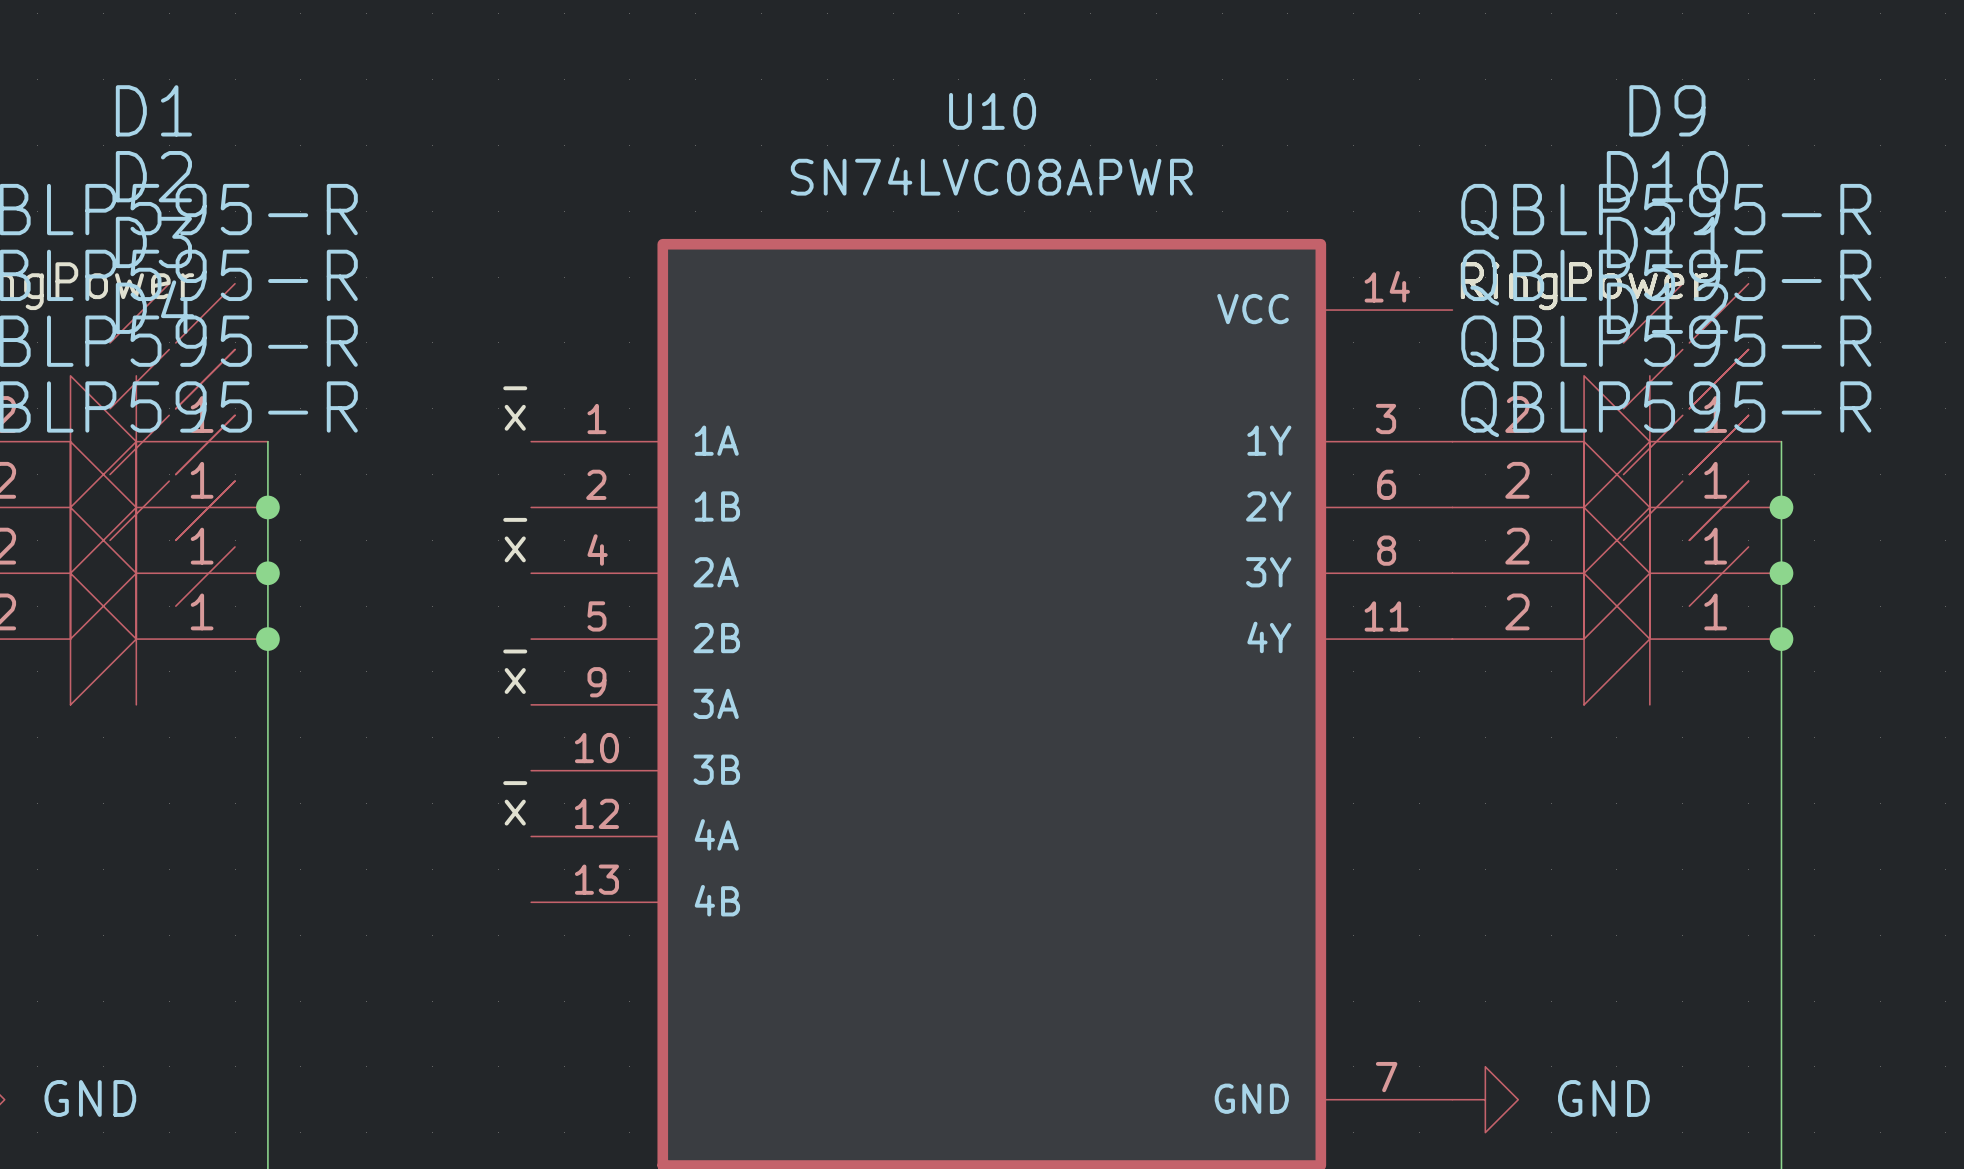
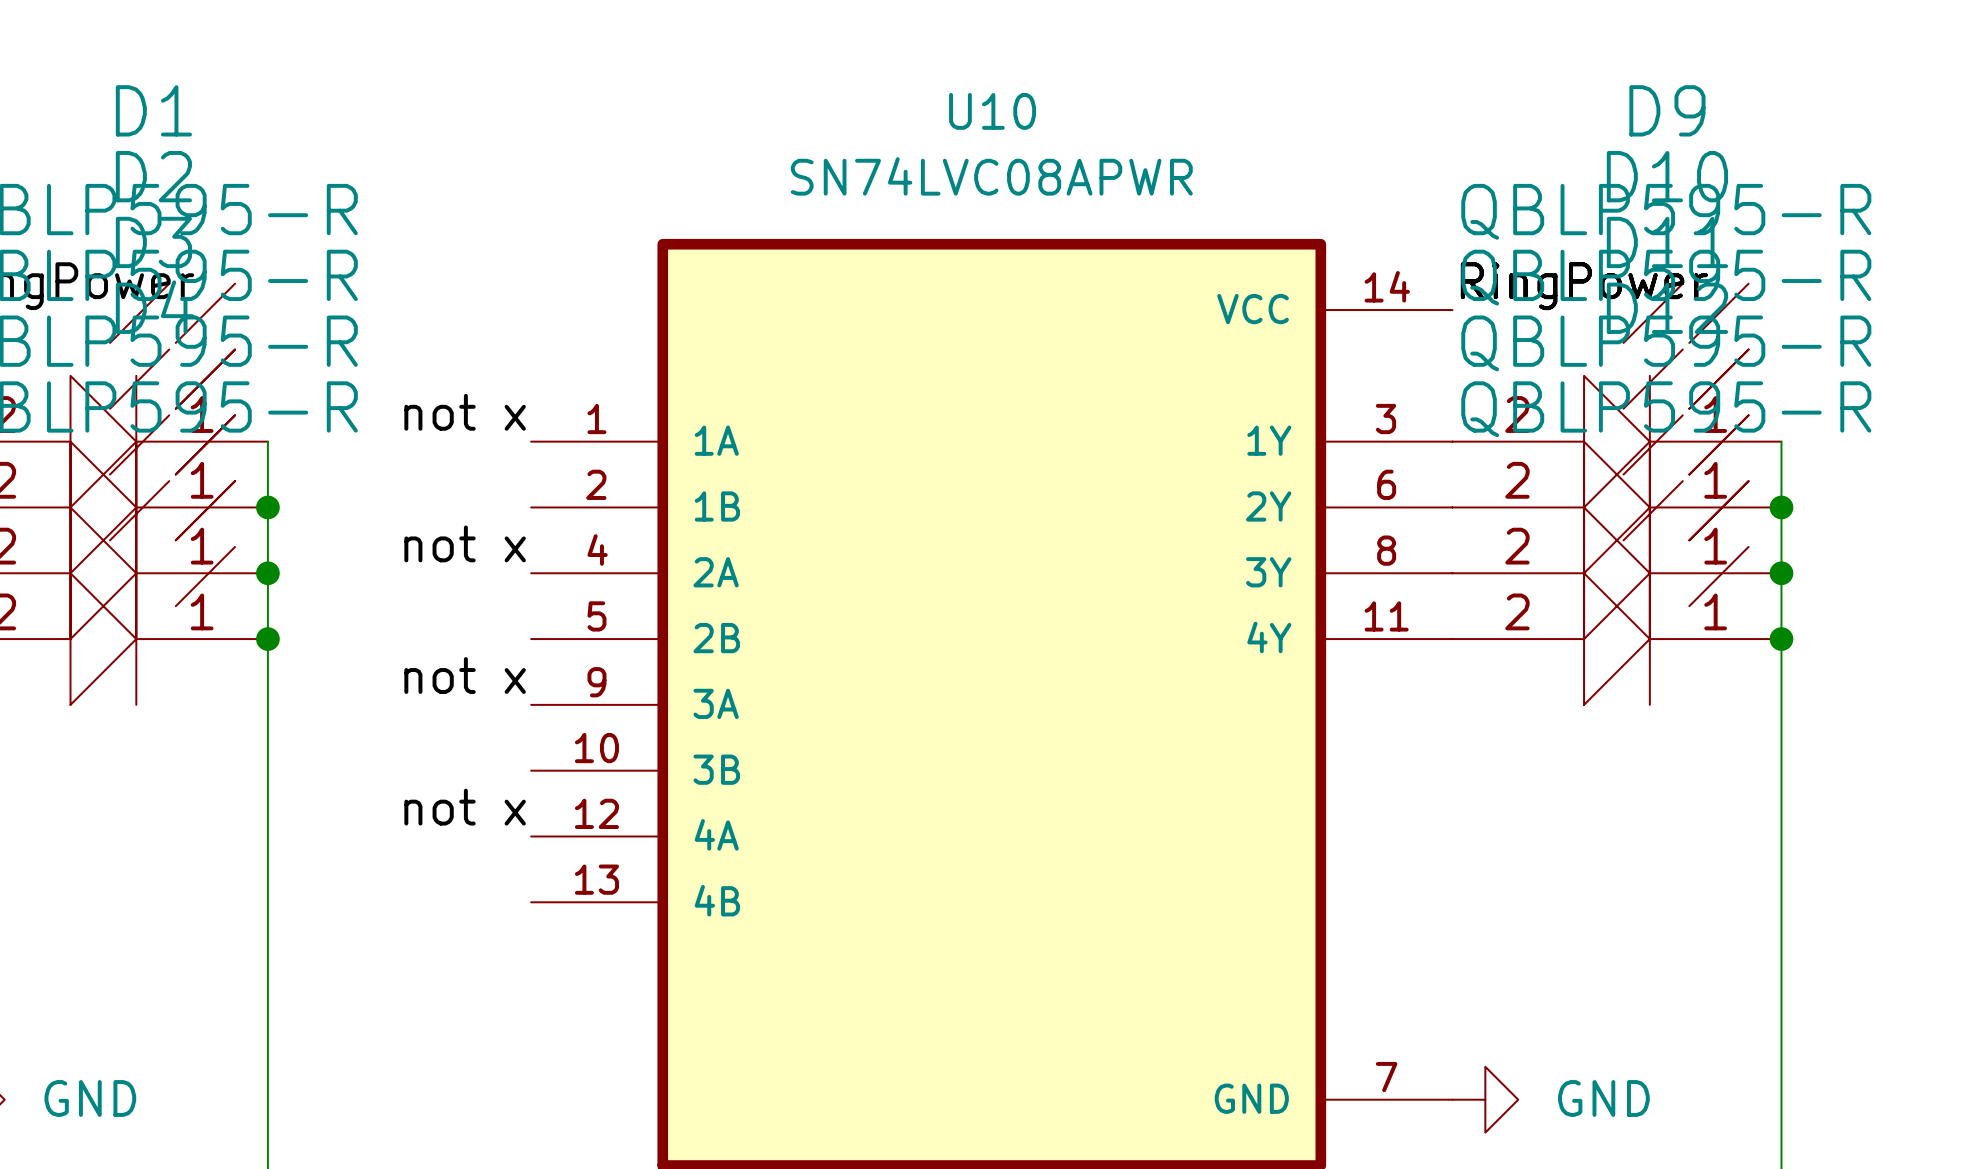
label: ~{x} (515, 408) -> not x (465, 412)
label: ~{x} (515, 540) -> not x (465, 543)
label: ~{x} (515, 671) -> not x (465, 675)
label: ~{x} (515, 803) -> not x (465, 807)

